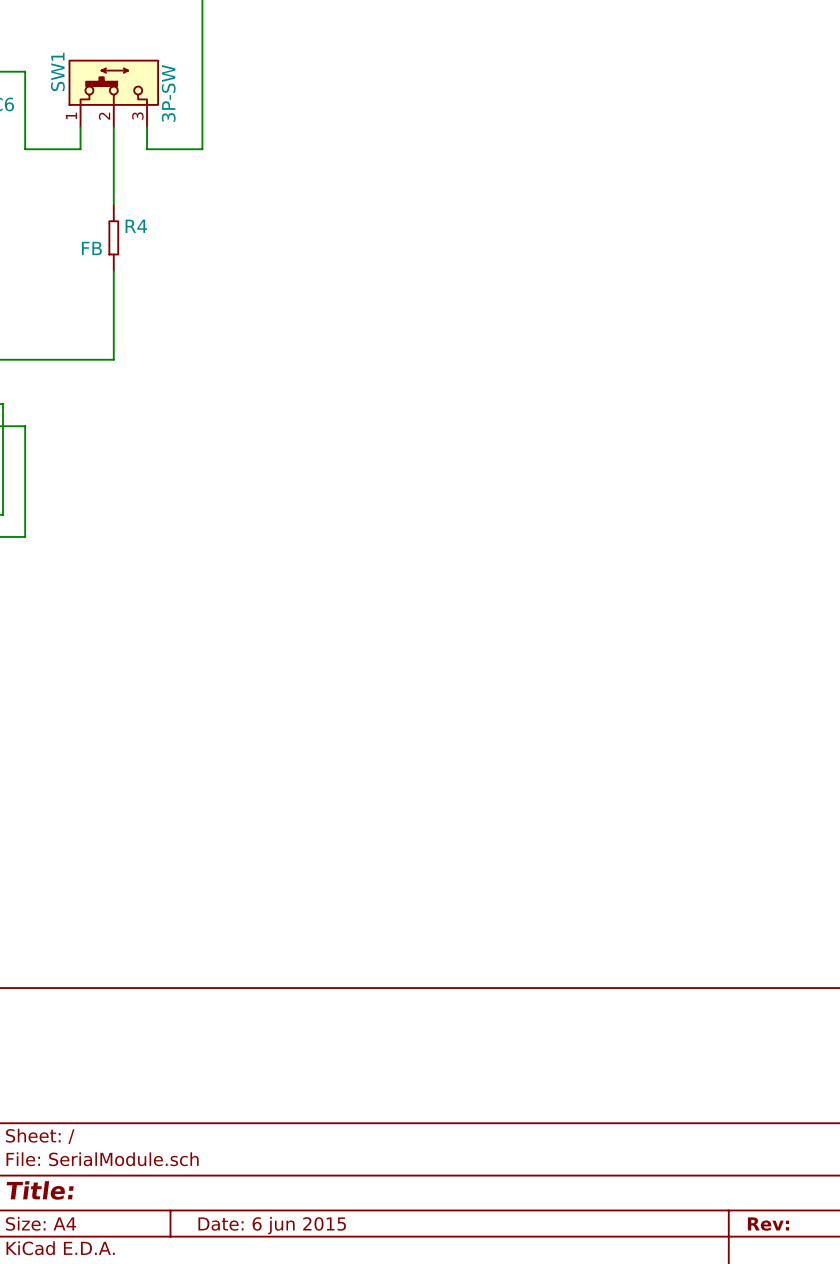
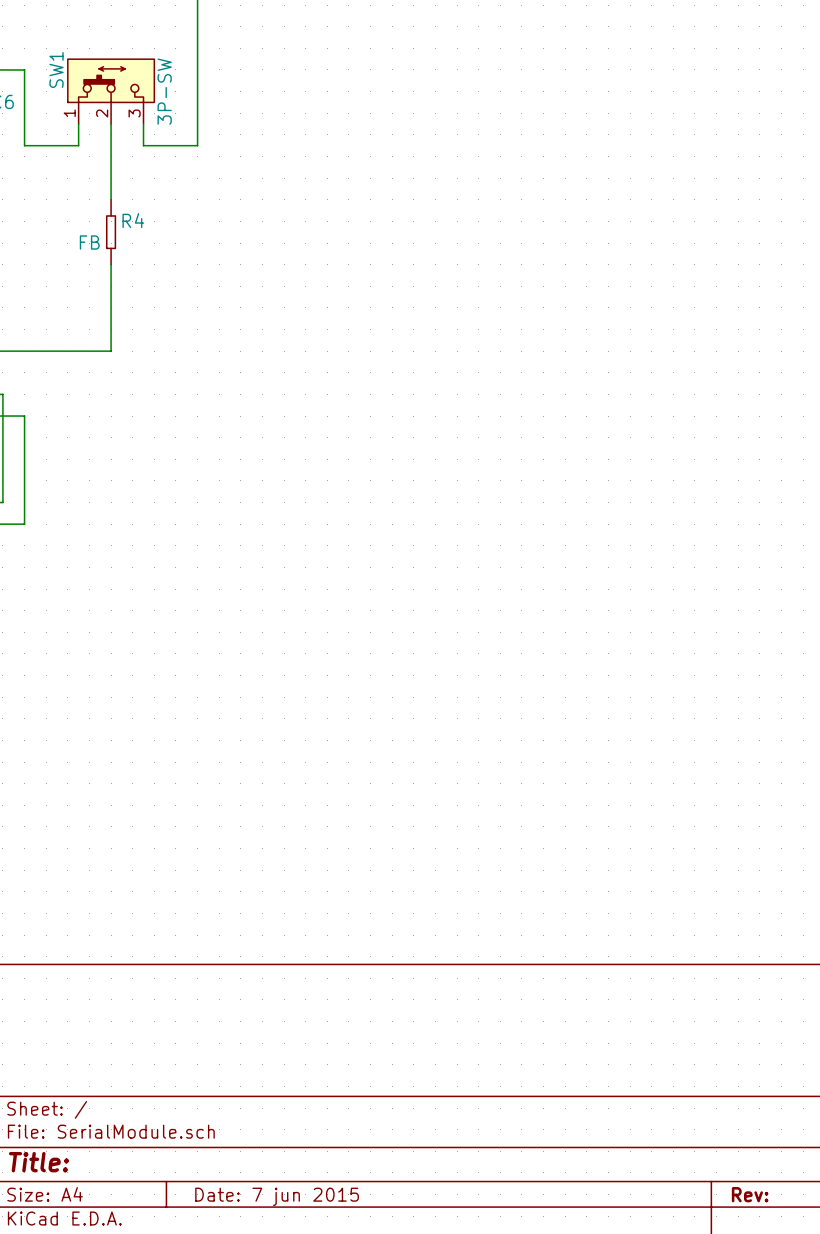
title block: Date: 6 jun 2015 (272, 1225) -> Date: 7 jun 2015 (277, 1196)

